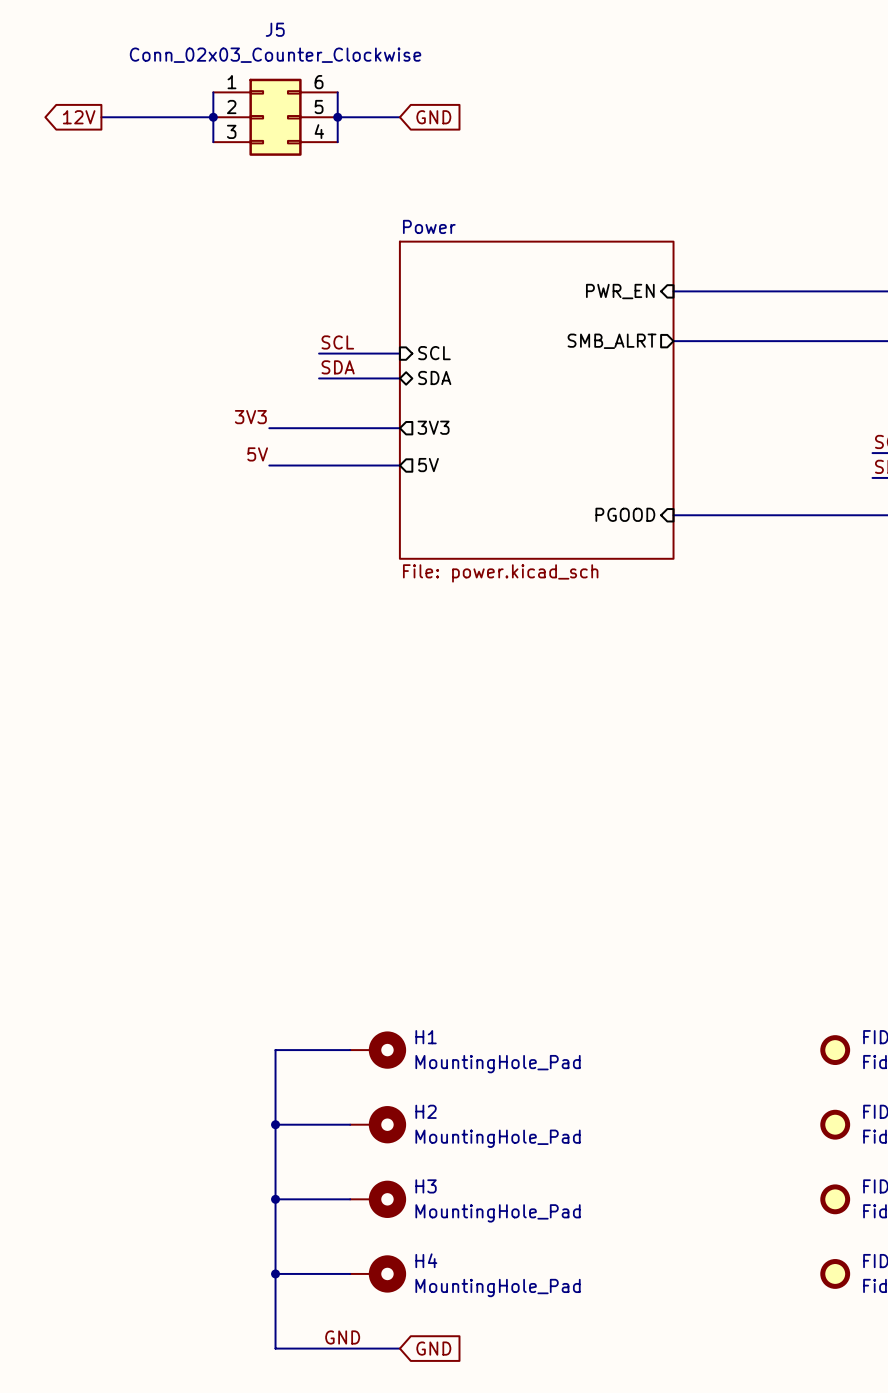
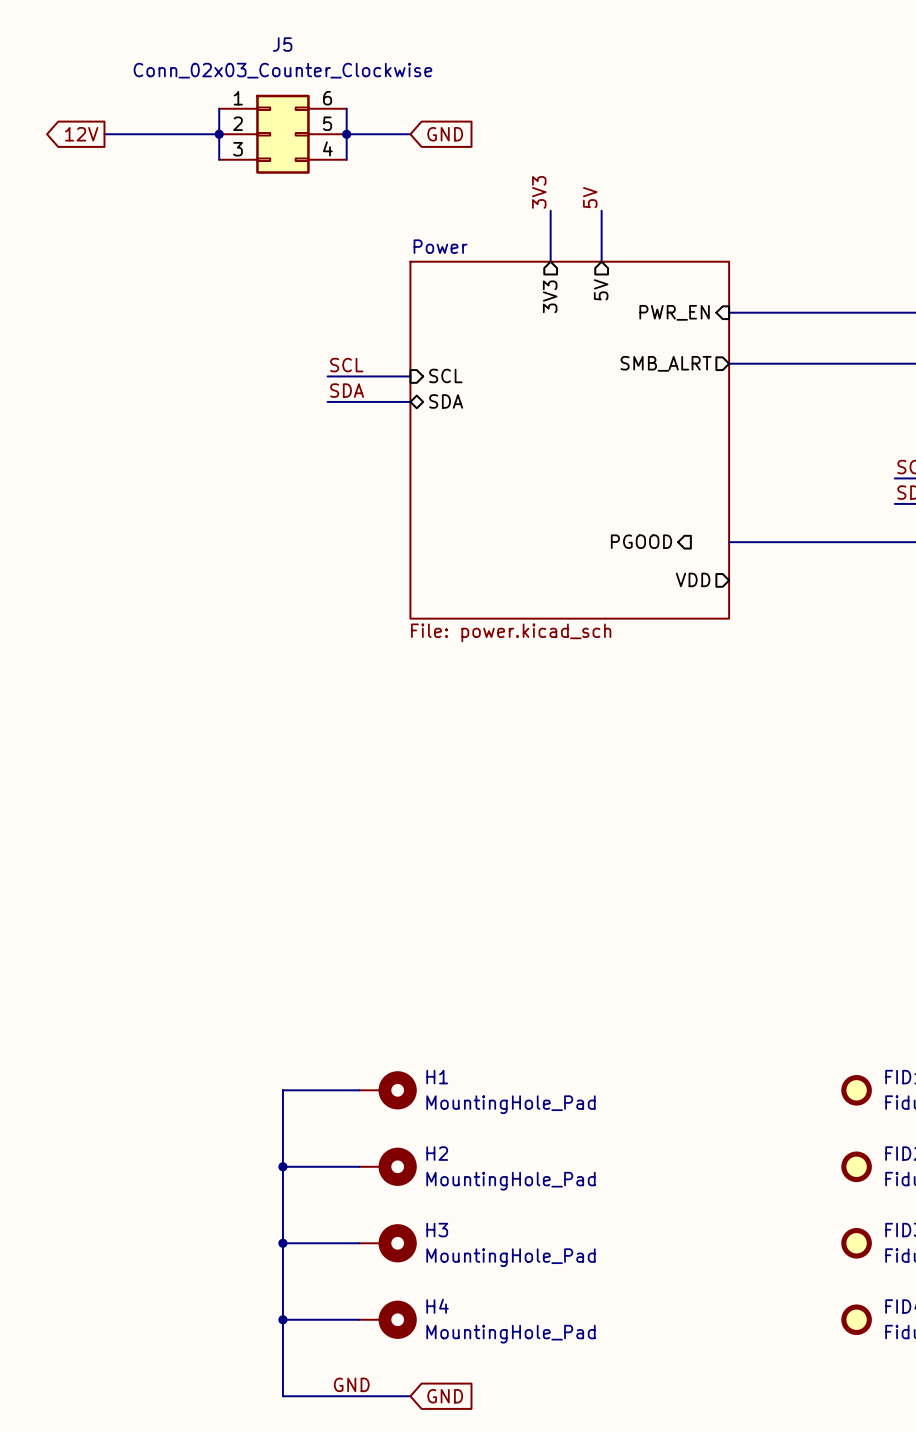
label: none -> 3V3 (539, 192)
label: none -> 5V (590, 197)
wire: none -> (550, 210) (550, 261)
wire: none -> (601, 210) (601, 261)
sheet pin: none -> 5V (601, 289)
sheet pin position: PWR_EN (620, 291) -> PWR_EN (674, 312)
wire: (673, 291) (710, 291) -> none
sheet pin position: SMB_ALRT (612, 341) -> SMB_ALRT (666, 363)
wire: (673, 341) (710, 341) -> none
sheet Power: File: power.kicad_sch (536, 400) -> none
sheet Power: none -> File: power.kicad_sch (569, 440)
label: 3V3 (250, 417) -> none
sheet pin rotation: 0° (433, 427) -> 90° clockwise (550, 296)
sheet pin position: 3V3 (433, 427) -> 3V3 (550, 296)
wire: (269, 428) (399, 428) -> none
label: 5V (257, 454) -> none
wire: (269, 465) (399, 465) -> none
sheet pin: 5V (428, 465) -> none
wire: (673, 515) (710, 515) -> none
sheet pin: none -> VDD (693, 579)

